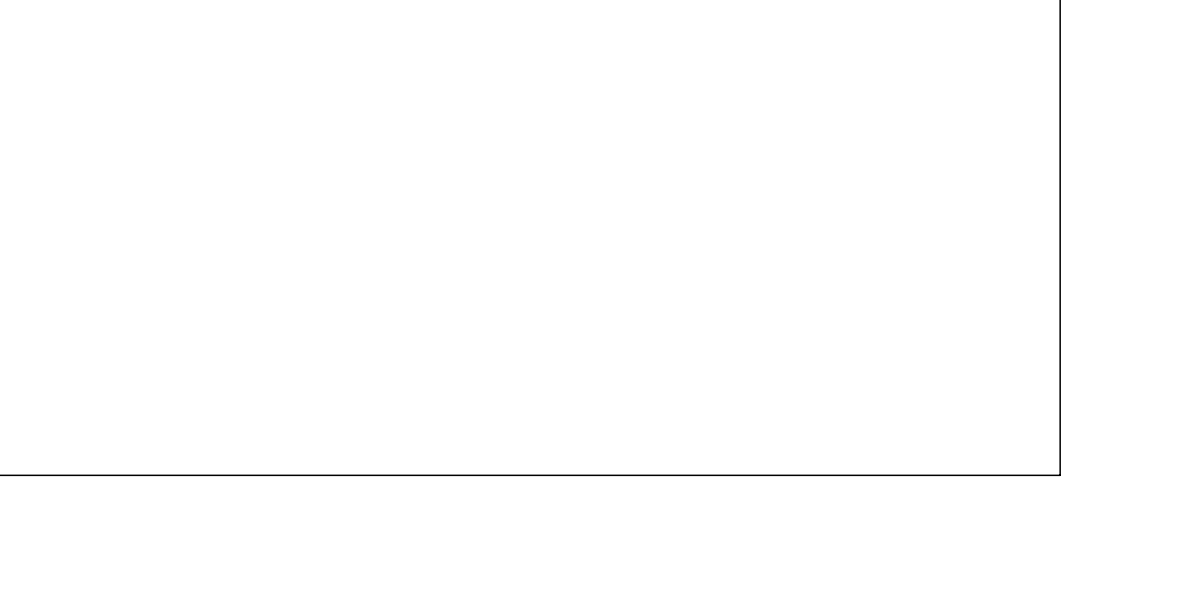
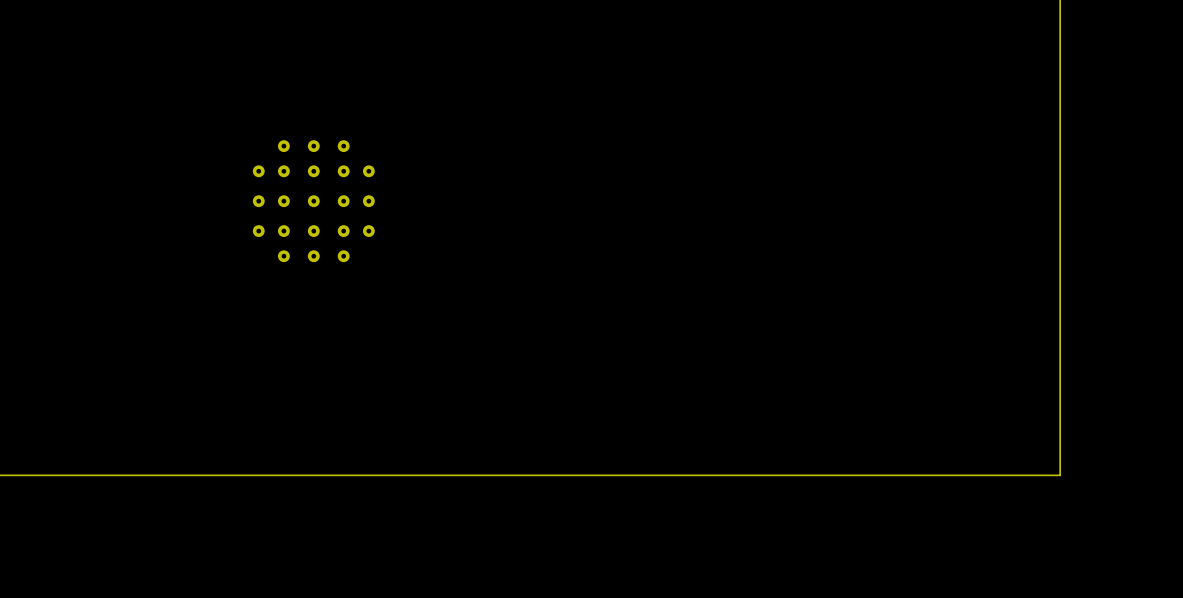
part: none -> (313, 201)

